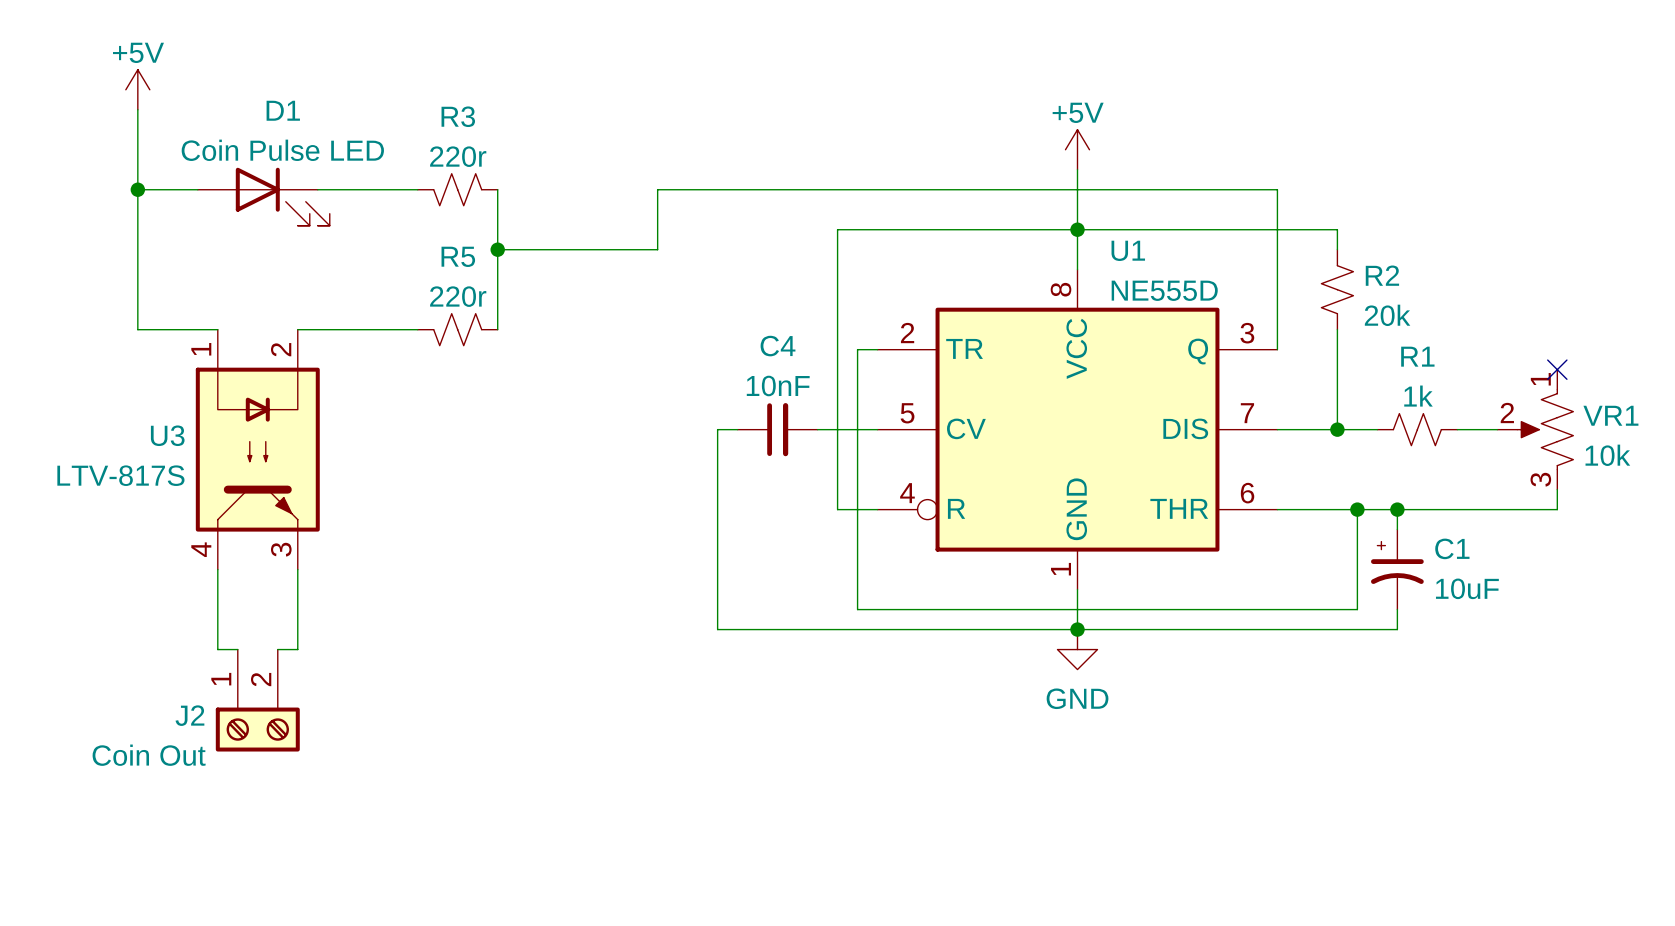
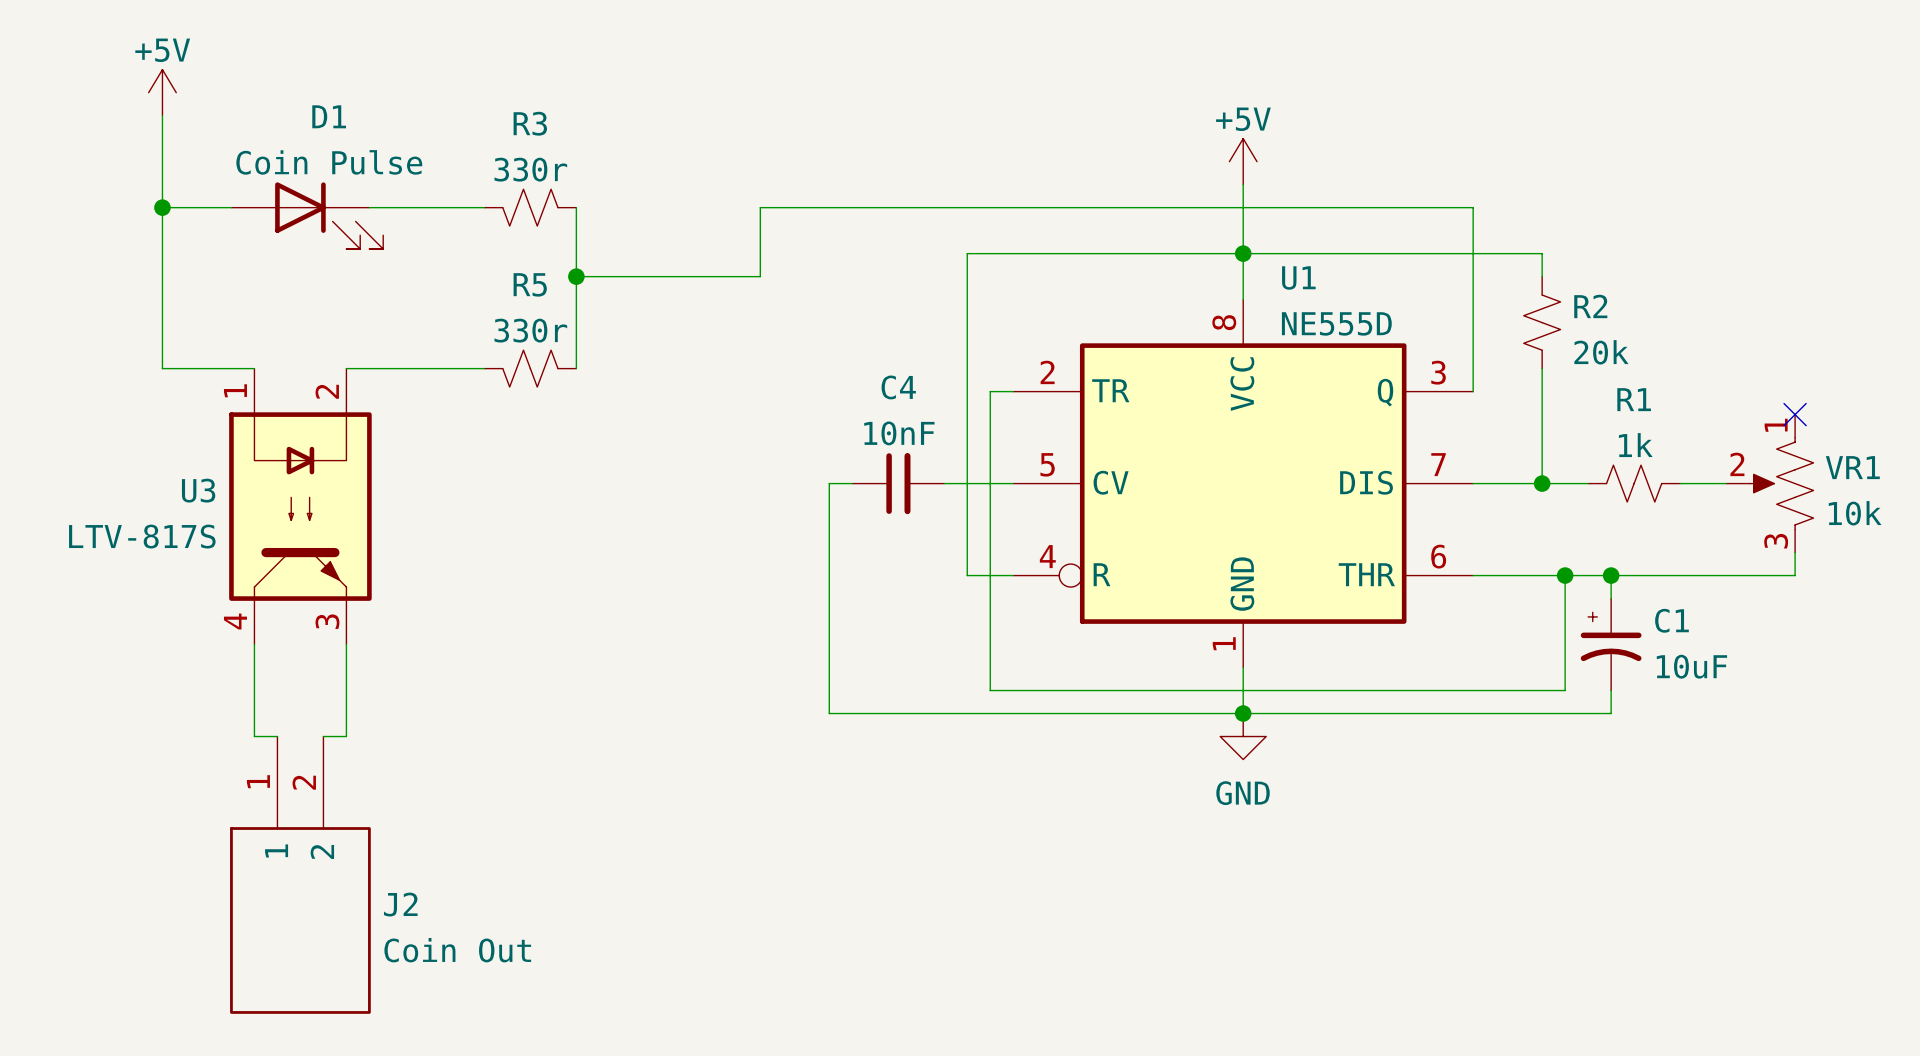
D1 value: Coin Pulse LED (282, 150) -> Coin Pulse (329, 162)
R3 value: 220r (458, 156) -> 330r (530, 169)
R5 value: 220r (458, 296) -> 330r (530, 330)
J2 symbol: [215, 649, 300, 752] -> [230, 736, 371, 1014]
J2 name position: J2 (189, 715) -> J2 (400, 904)
J2 value position: Coin Out (149, 755) -> Coin Out (457, 950)

